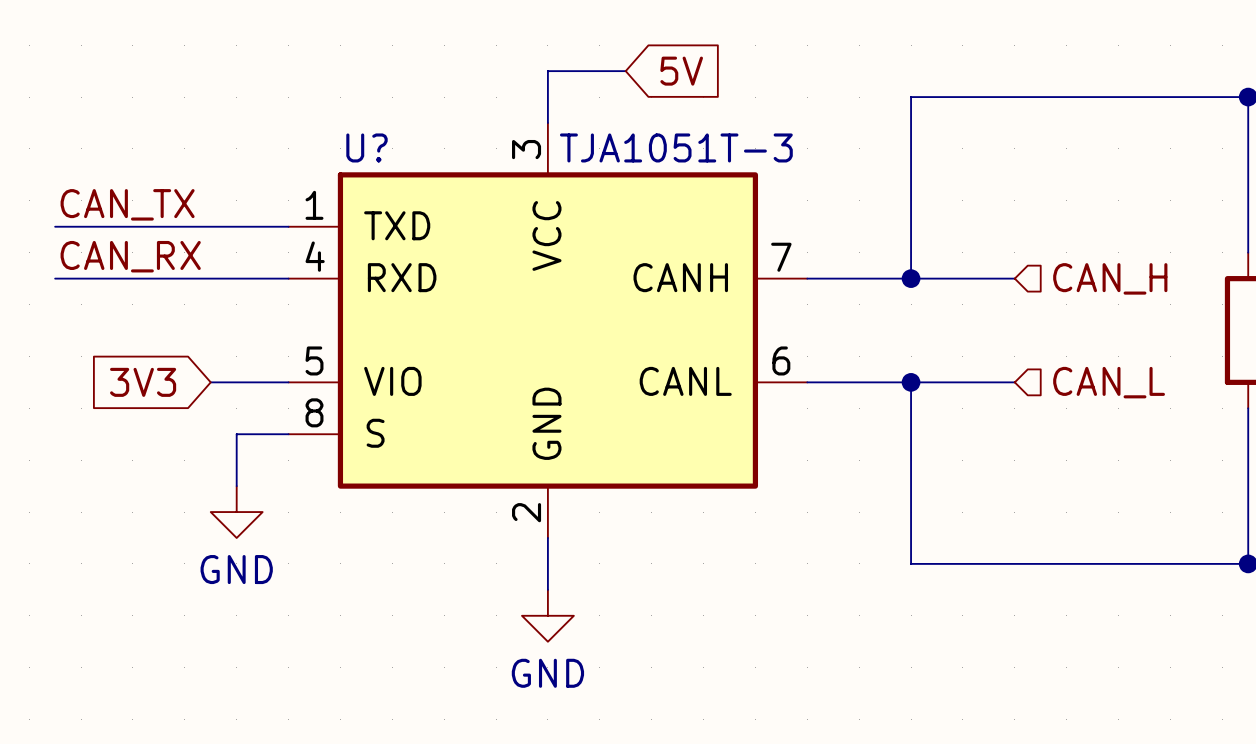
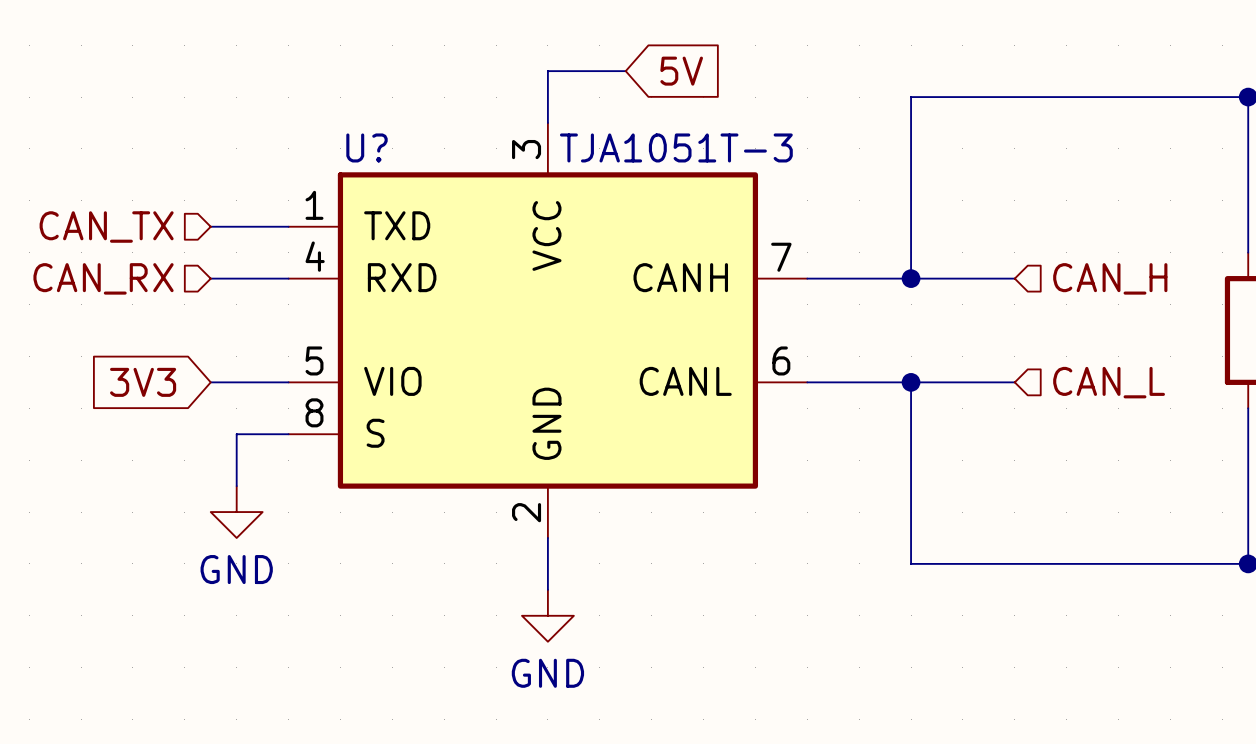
label: CAN_TX (127, 204) -> none
wire: (55, 226) (210, 226) -> none
hierarchical label: none -> CAN_TX (106, 227)
label: CAN_RX (130, 256) -> none
wire: (55, 278) (210, 278) -> none
hierarchical label: none -> CAN_RX (103, 278)

